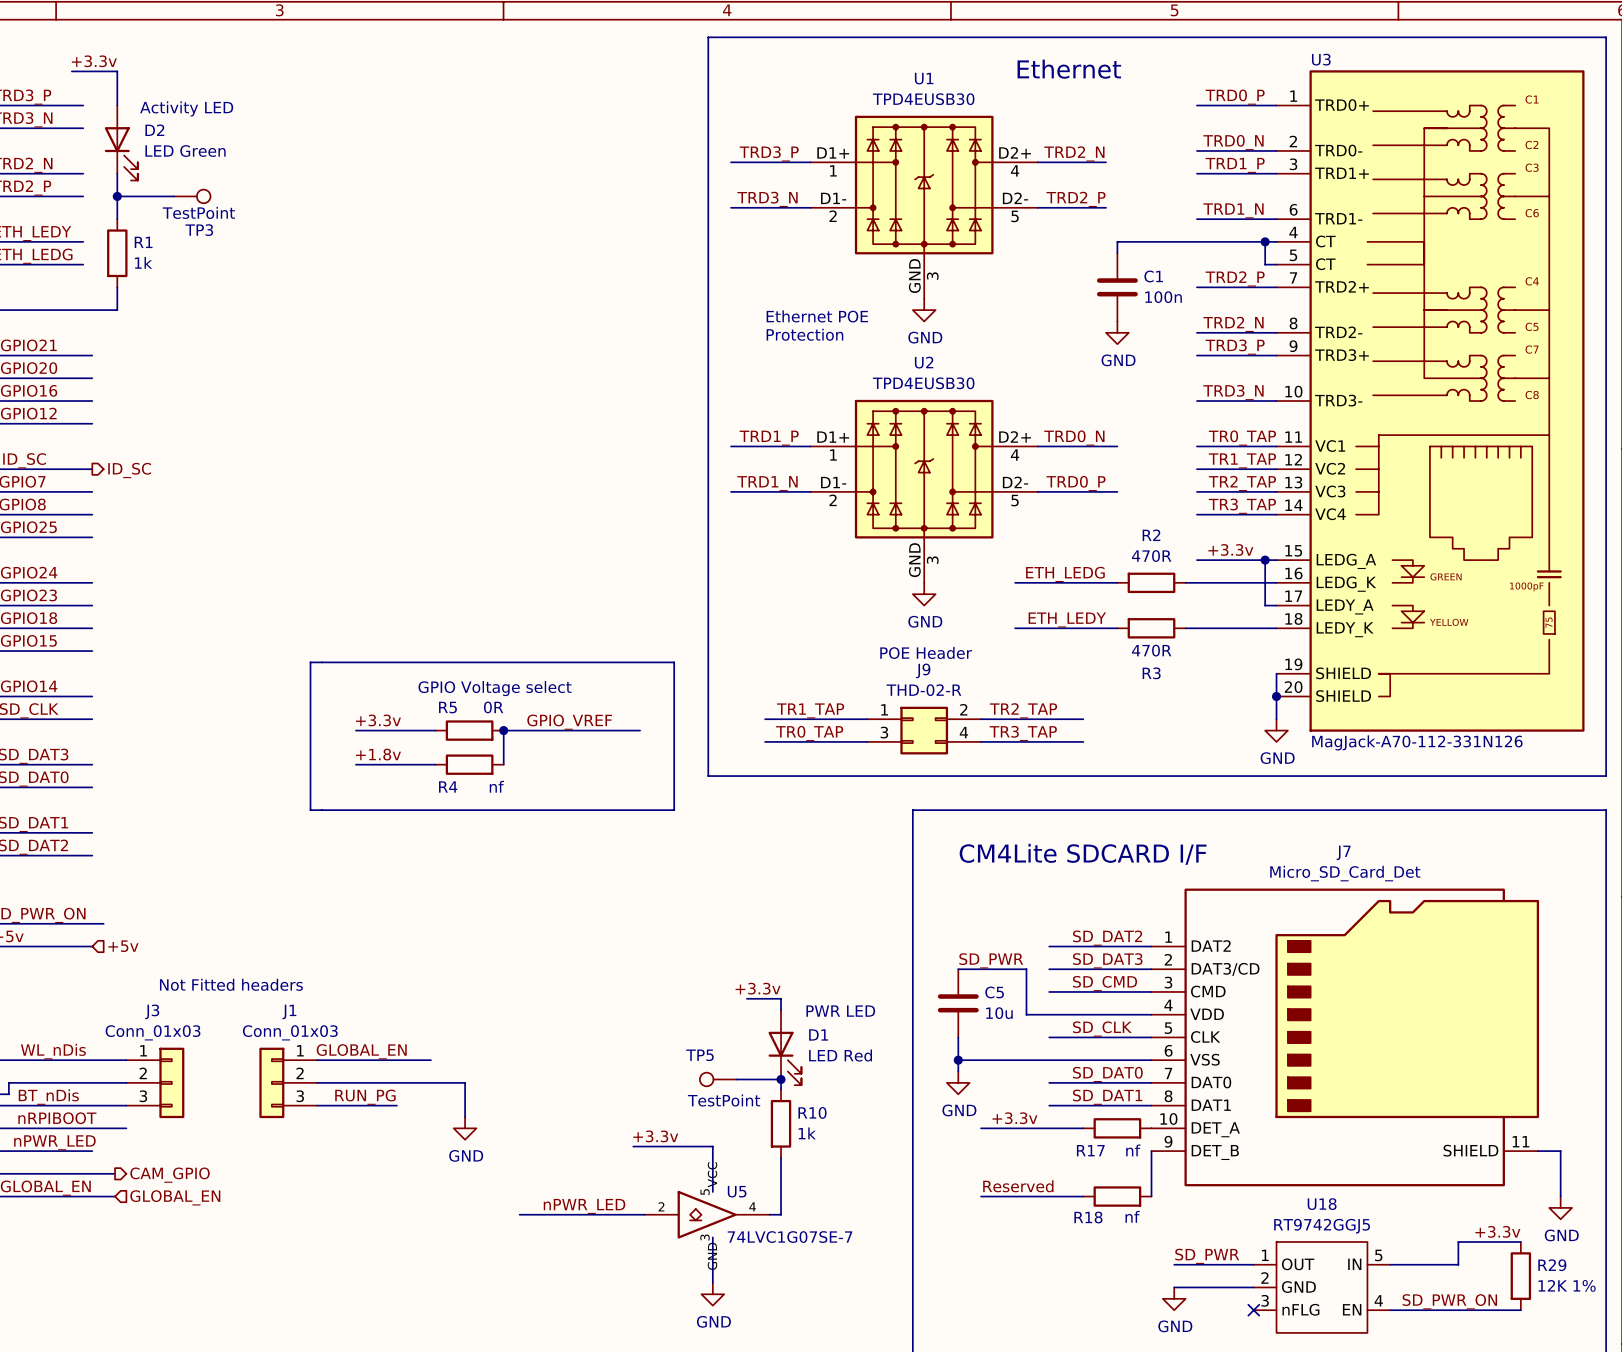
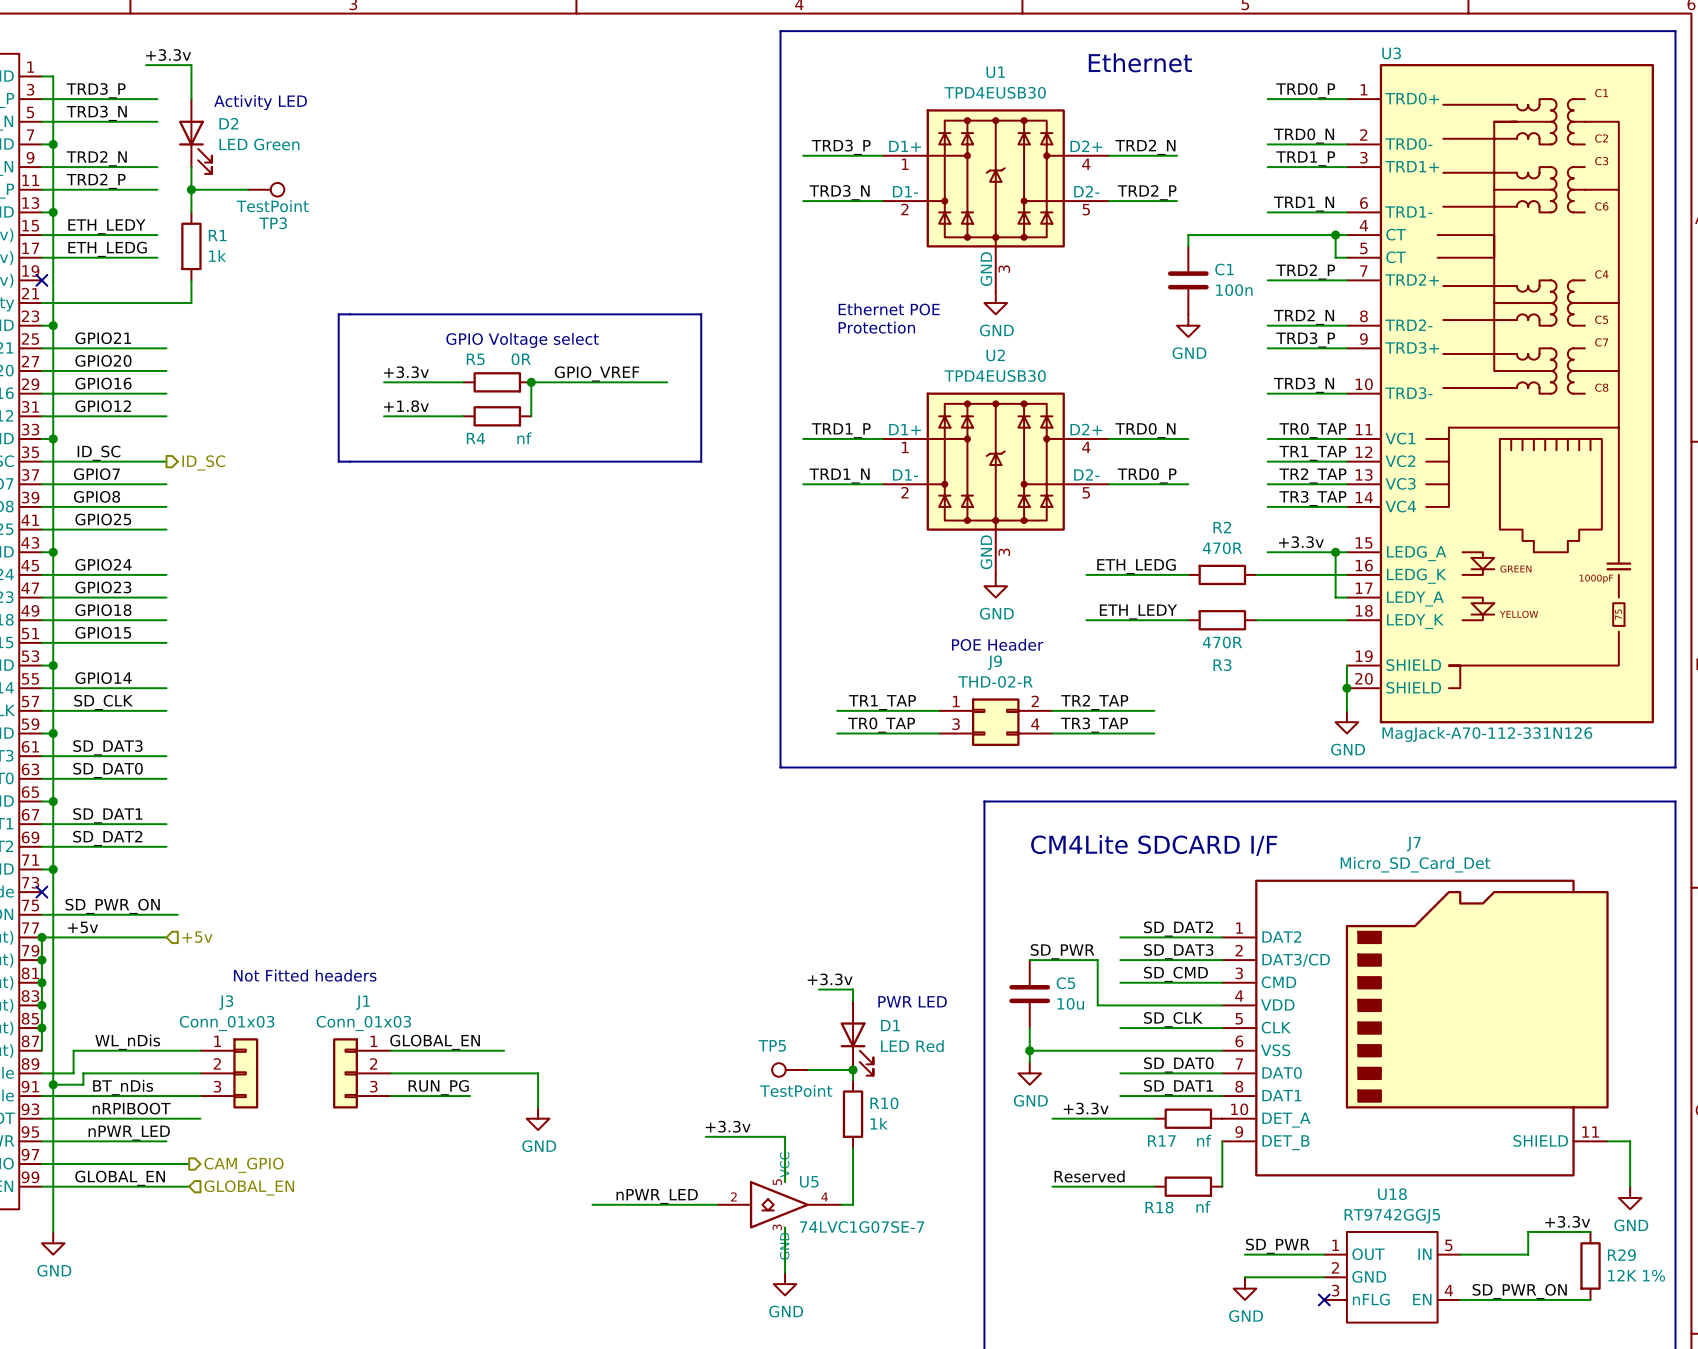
line: none -> (338, 314) (701, 314) (701, 461) (338, 461) (338, 314)
text: none -> GPIO Voltage select (522, 340)
label: none -> +3.3v (406, 372)
label: none -> GPIO_VREF (597, 373)
wire: none -> (384, 382) (463, 382)
junction: none -> (531, 382)
wire: none -> (667, 382) (531, 382) (531, 416)
label: none -> +1.8v (406, 406)
wire: none -> (384, 416) (463, 416)
line: (310, 662) (674, 662) (674, 810) (310, 810) (310, 662) -> none
text: GPIO Voltage select (495, 688) -> none
label: +3.3v (378, 720) -> none
label: GPIO_VREF (569, 722) -> none
wire: (355, 730) (435, 730) -> none
R5 position: (469, 730) -> (497, 382)
junction: (503, 730) -> none
wire: (640, 730) (503, 730) (503, 764) -> none
label: +1.8v (378, 754) -> none
wire: (355, 764) (435, 764) -> none
R4 position: (469, 764) -> (497, 416)

